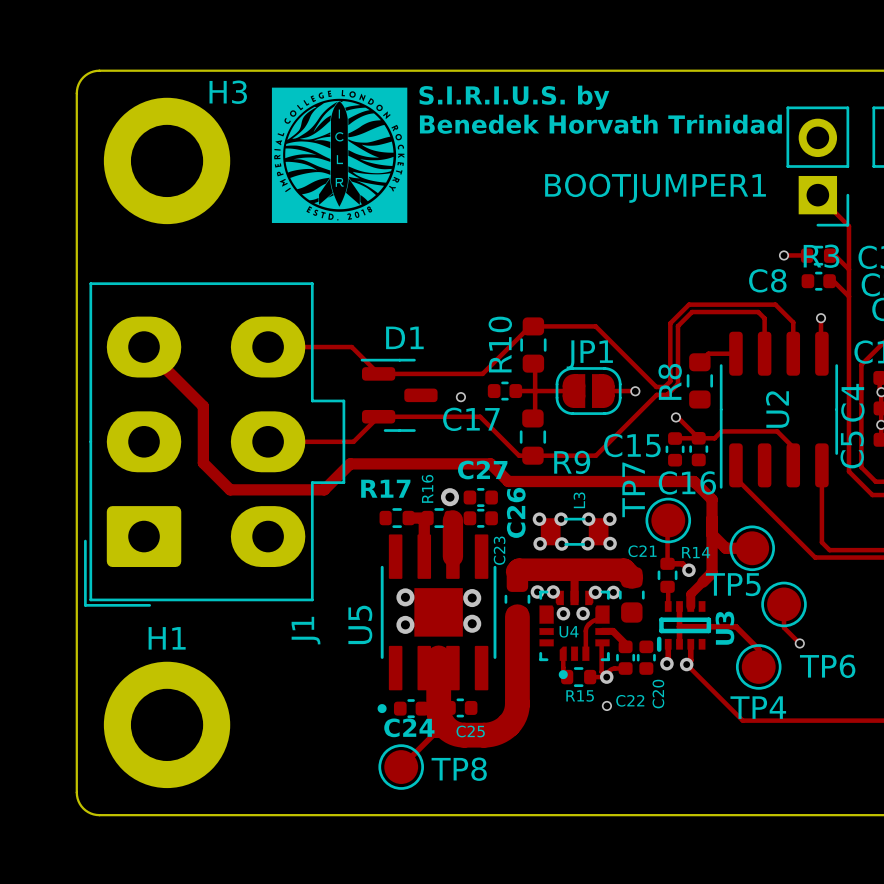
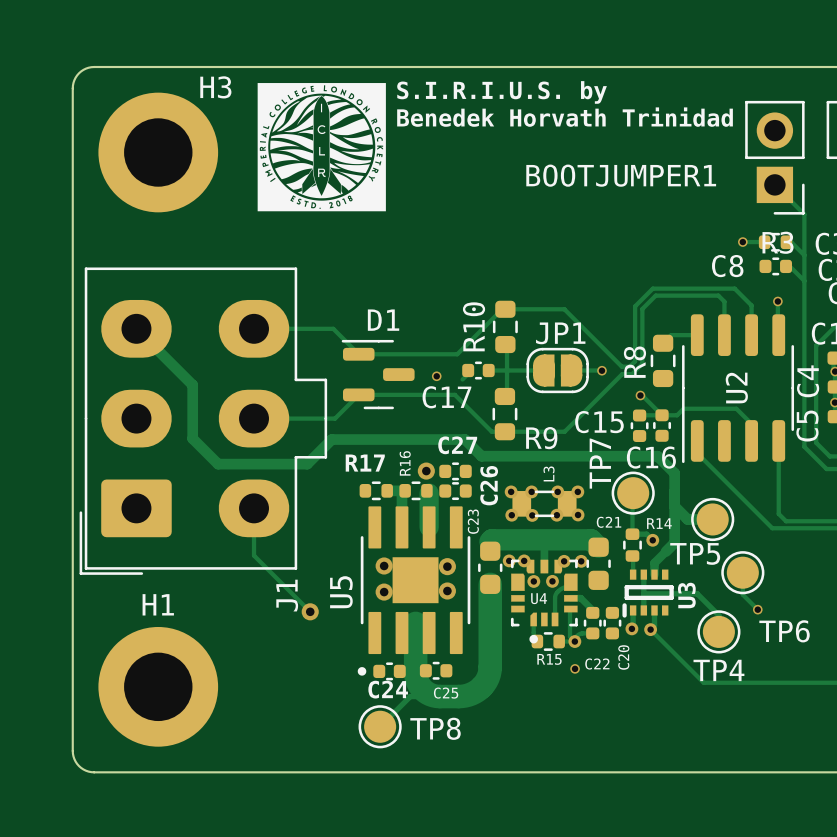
track: none -> (466, 375) (462, 379)
track: none -> (254, 508) (254, 555) (310, 611)
via: none -> (310, 611)

